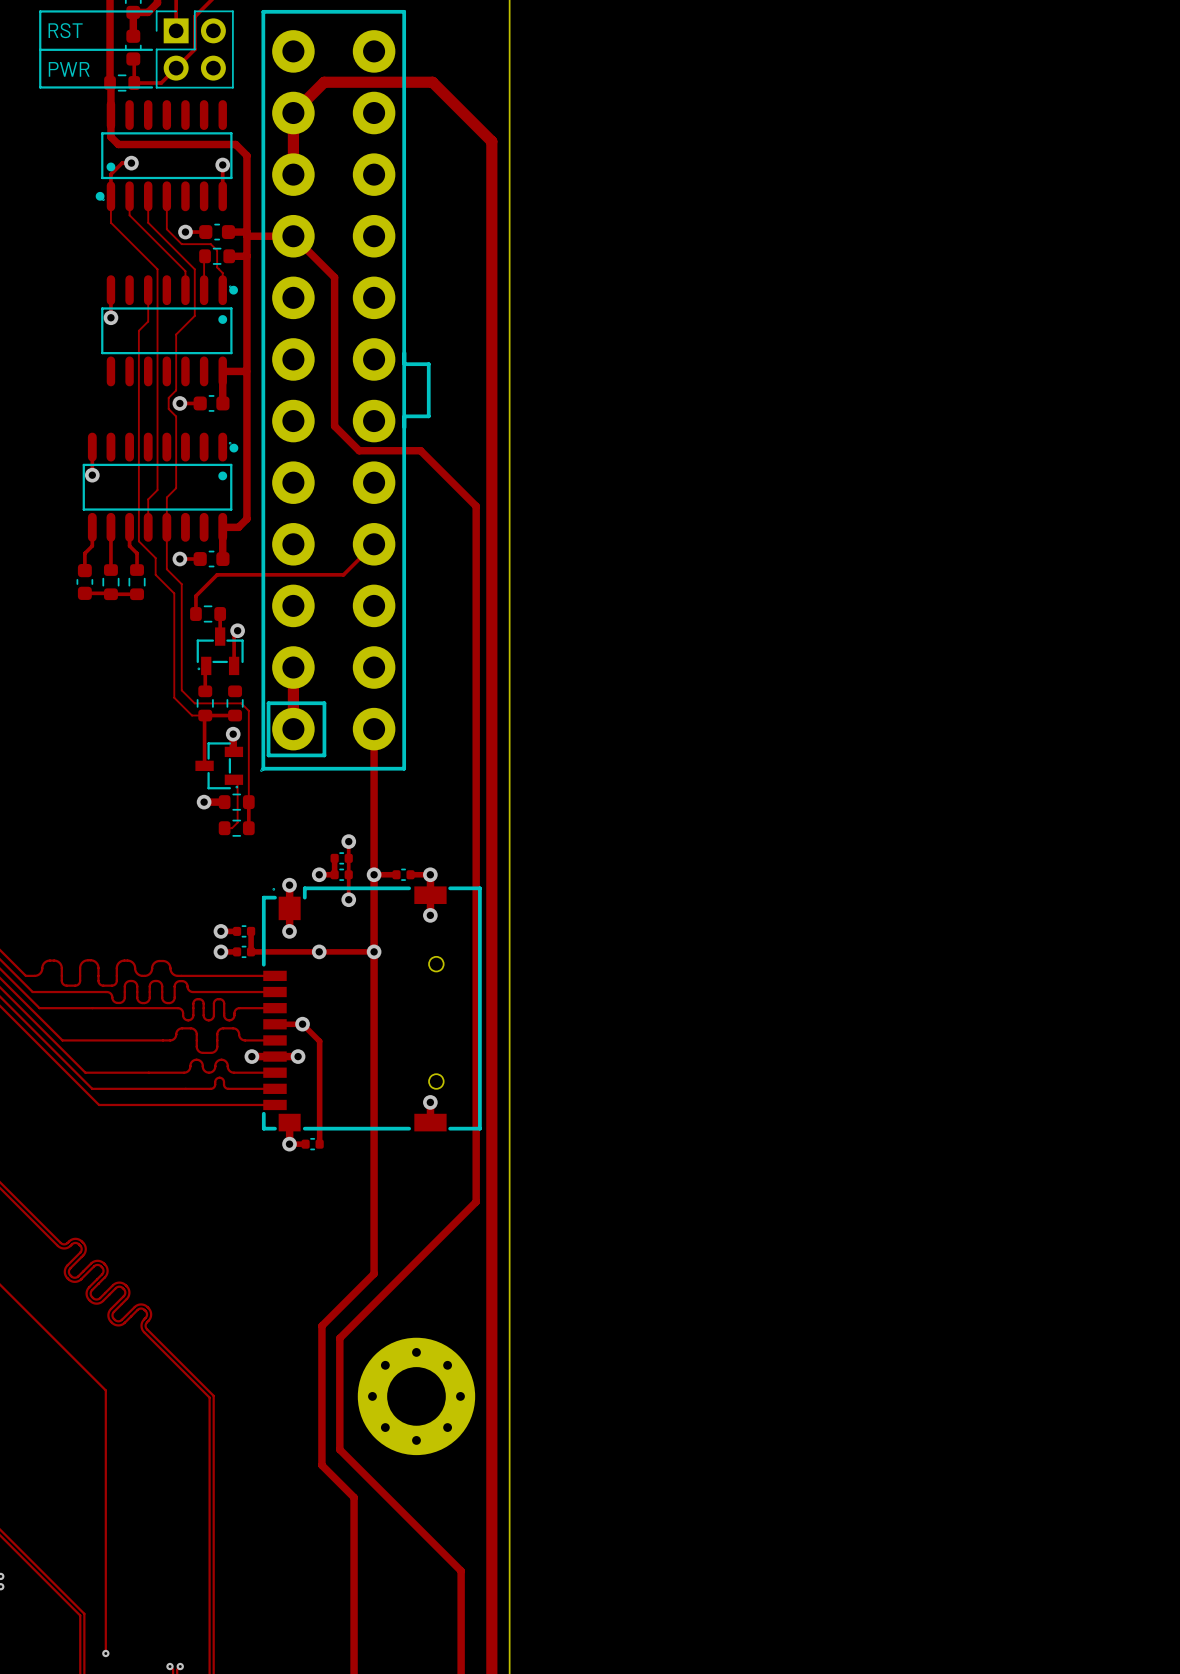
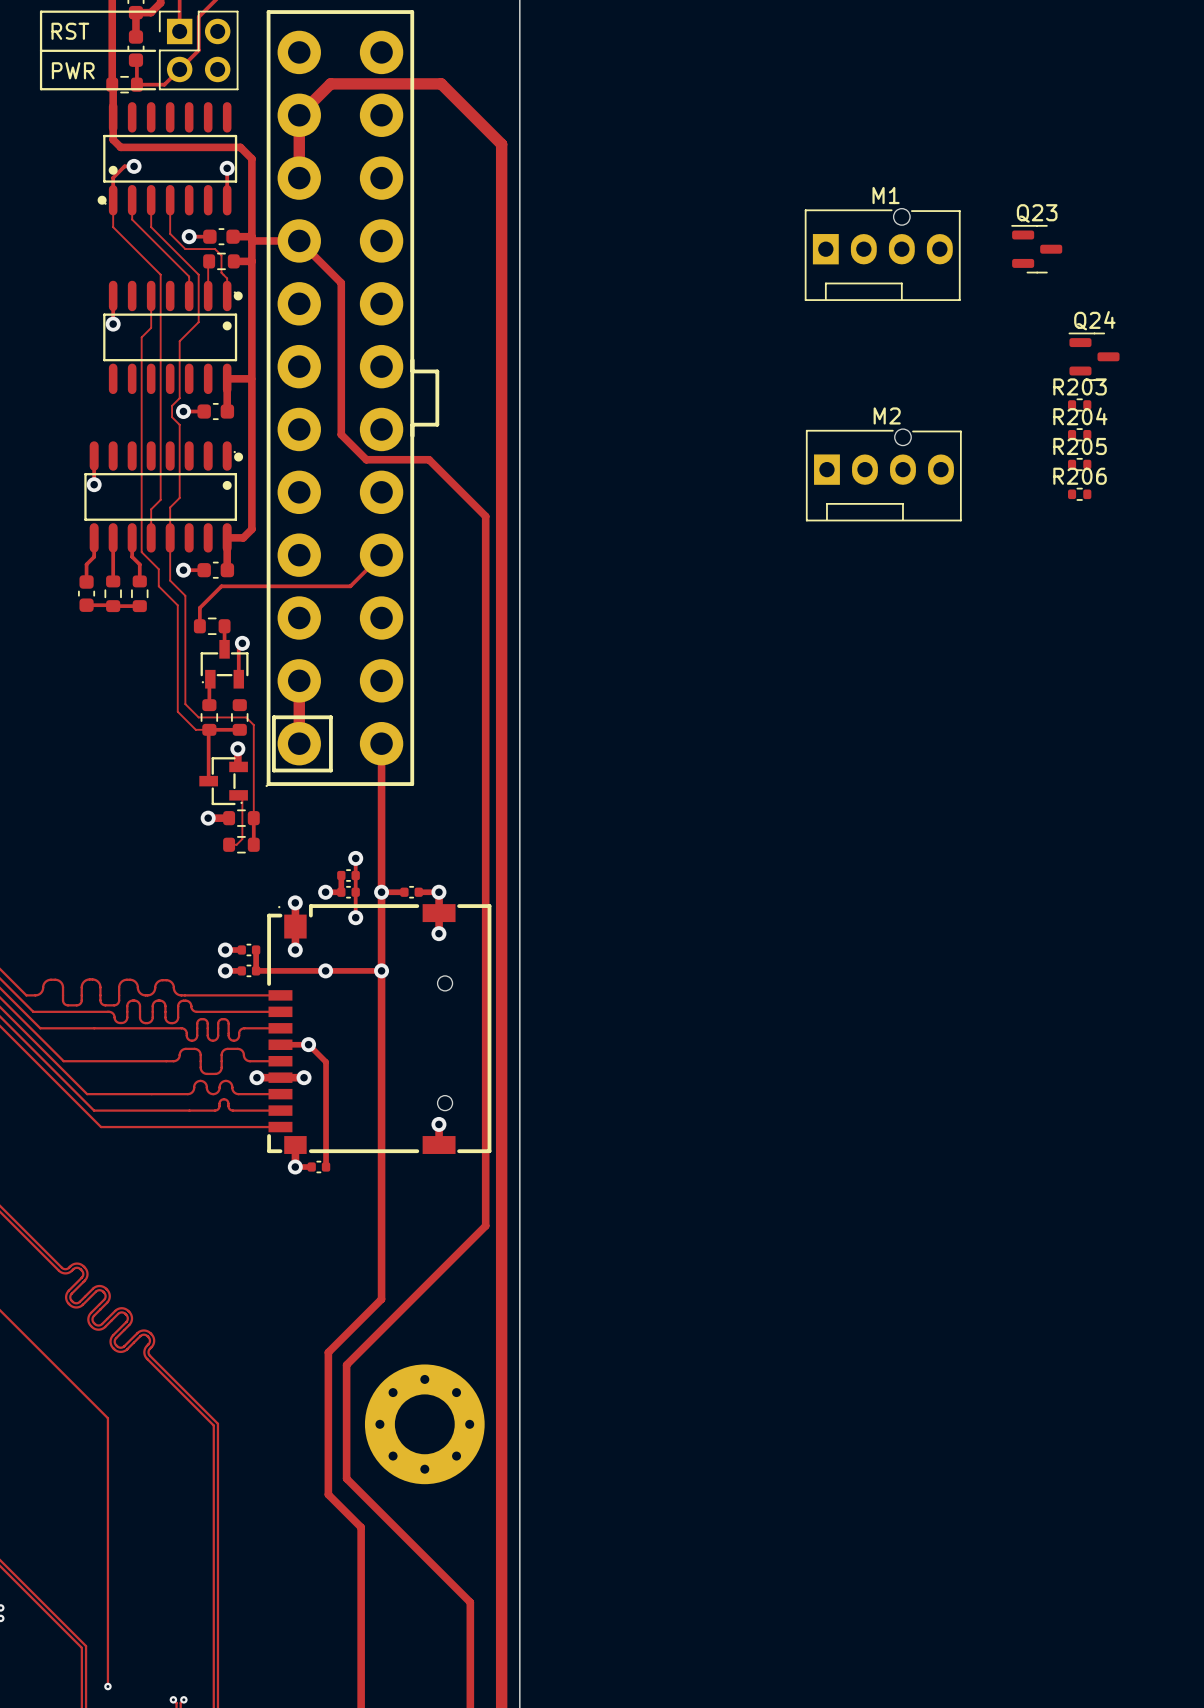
Q23: none -> (1036, 249)
M1: none -> (882, 254)
Q24: none -> (1094, 356)
R203: none -> (1079, 404)
R204: none -> (1079, 434)
R205: none -> (1079, 464)
M2: none -> (883, 475)
R206: none -> (1079, 494)

